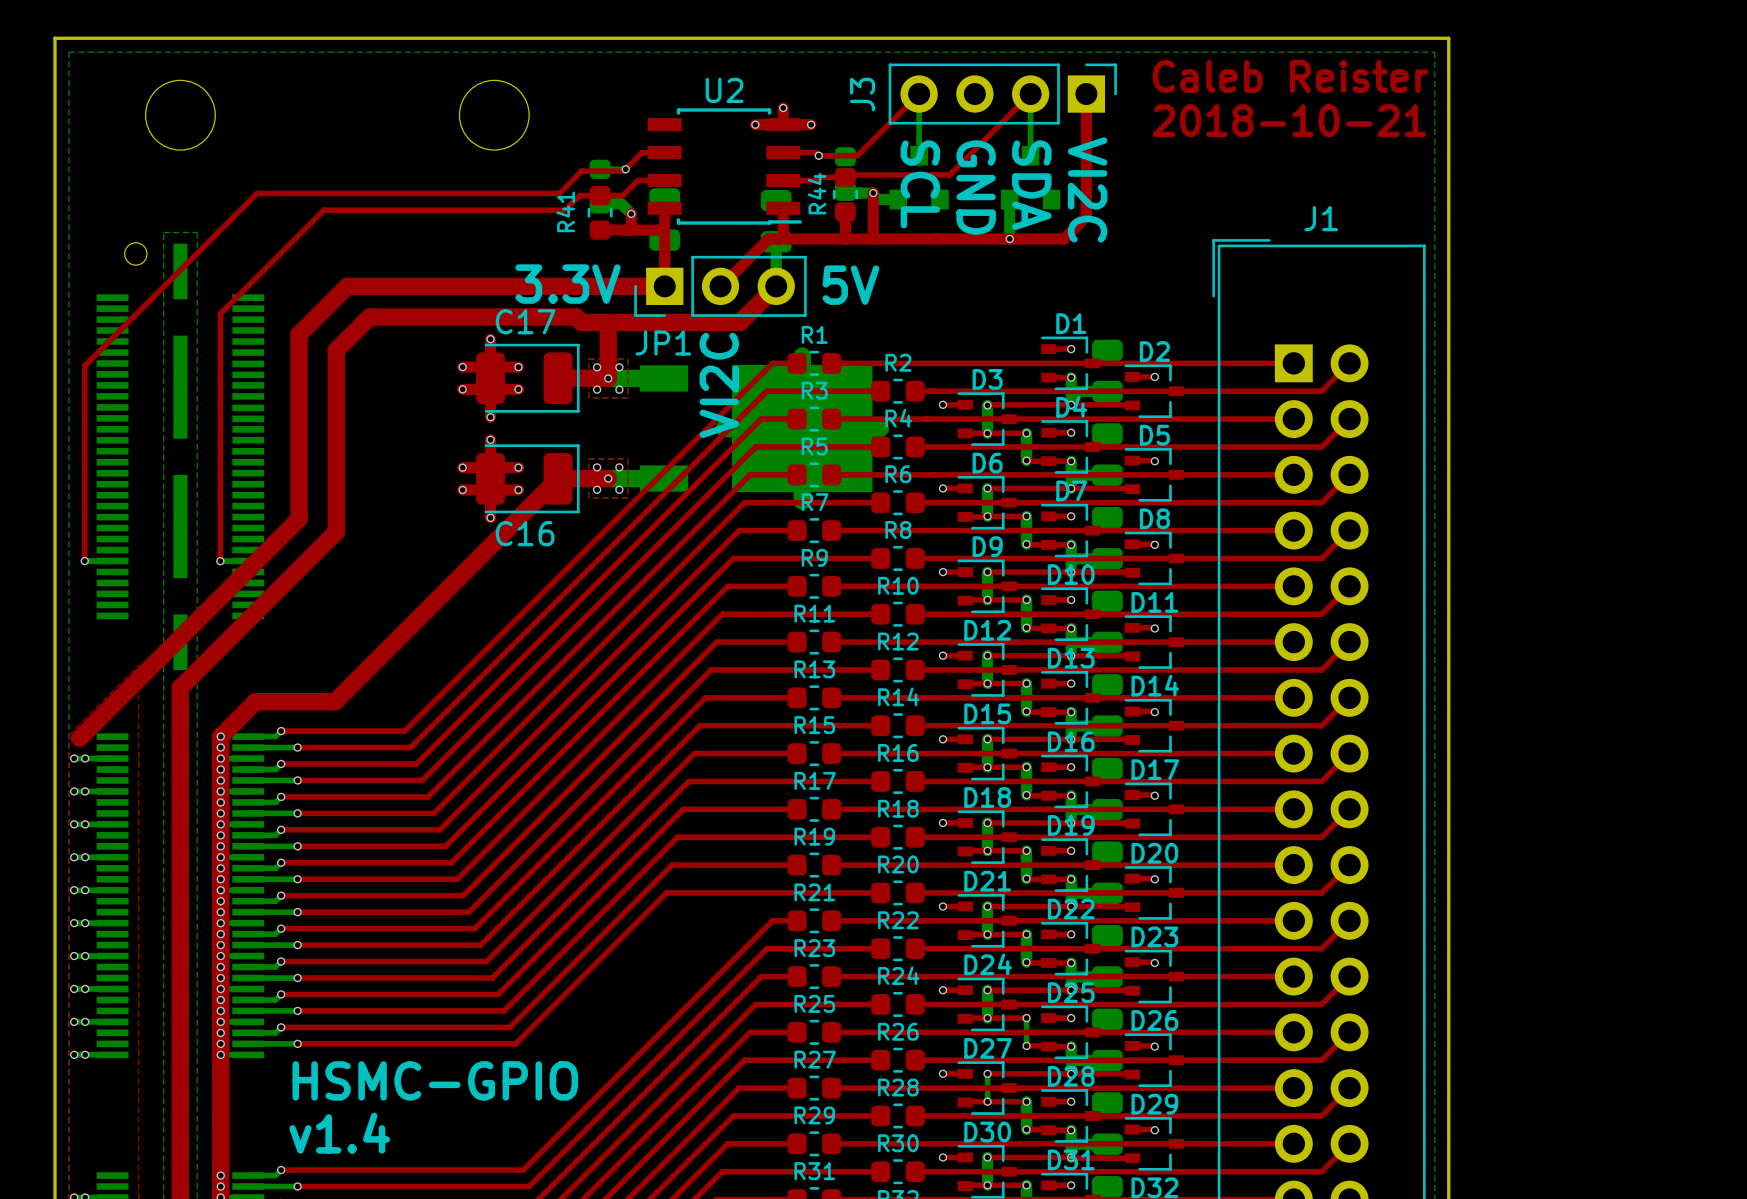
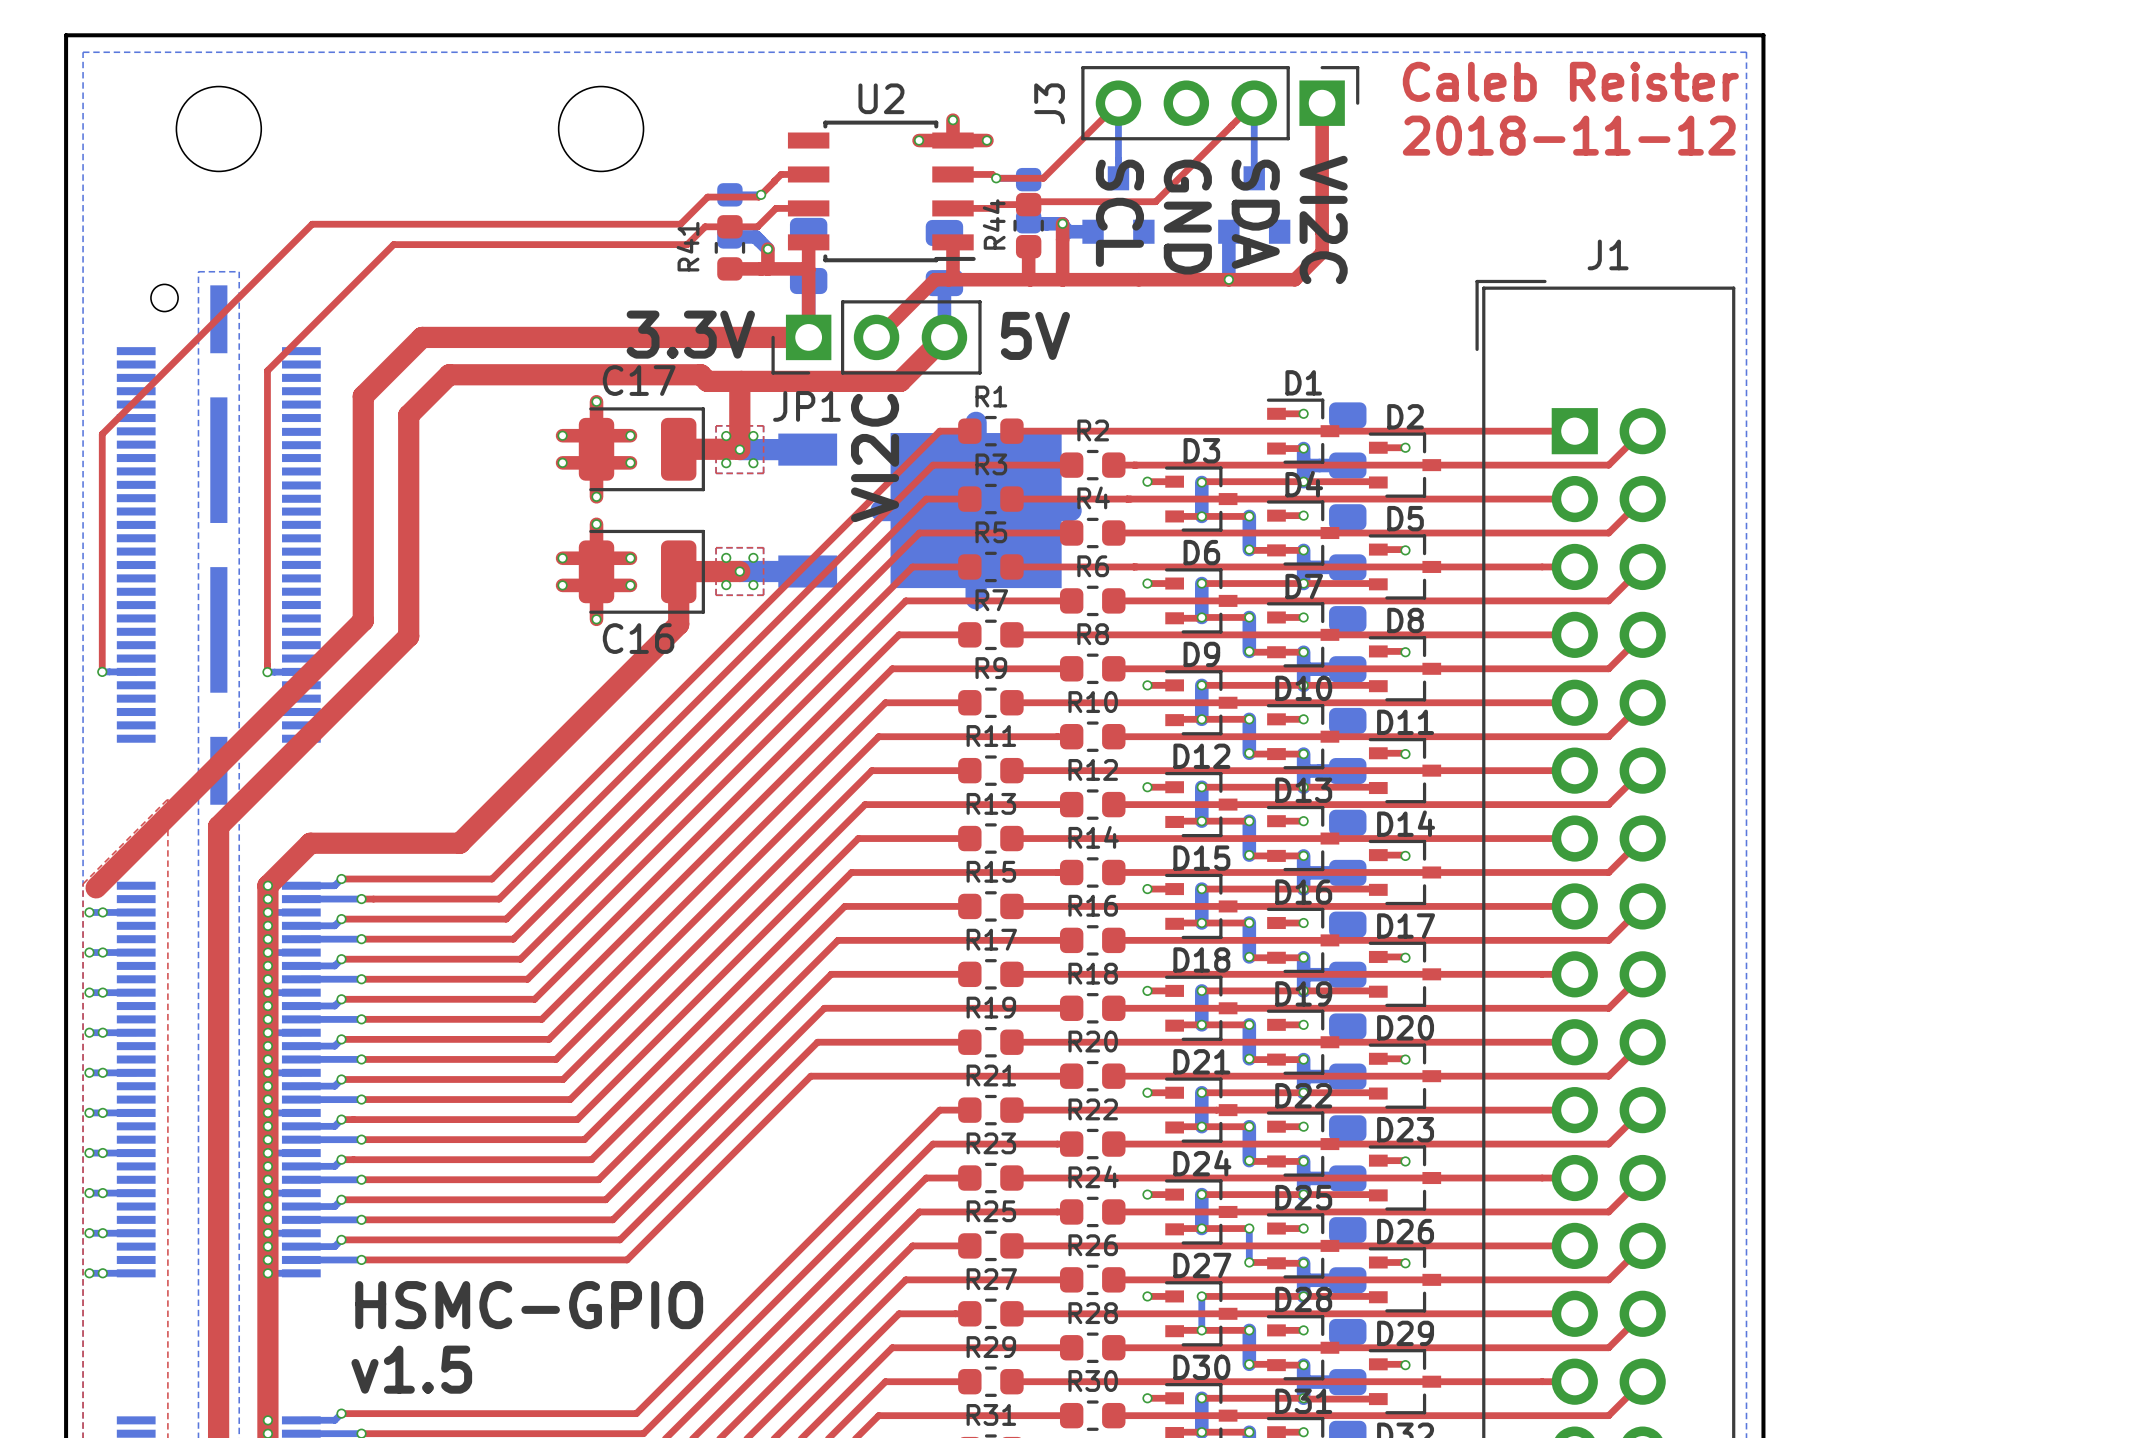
text: 2018-10-21 (1289, 120) -> 2018-11-12 (1569, 135)
top track: (558, 478) (335, 701) -> (678, 571) (678, 624) (459, 843) (407, 843)
text: v1.4 (339, 1133) -> v1.5 (411, 1369)

